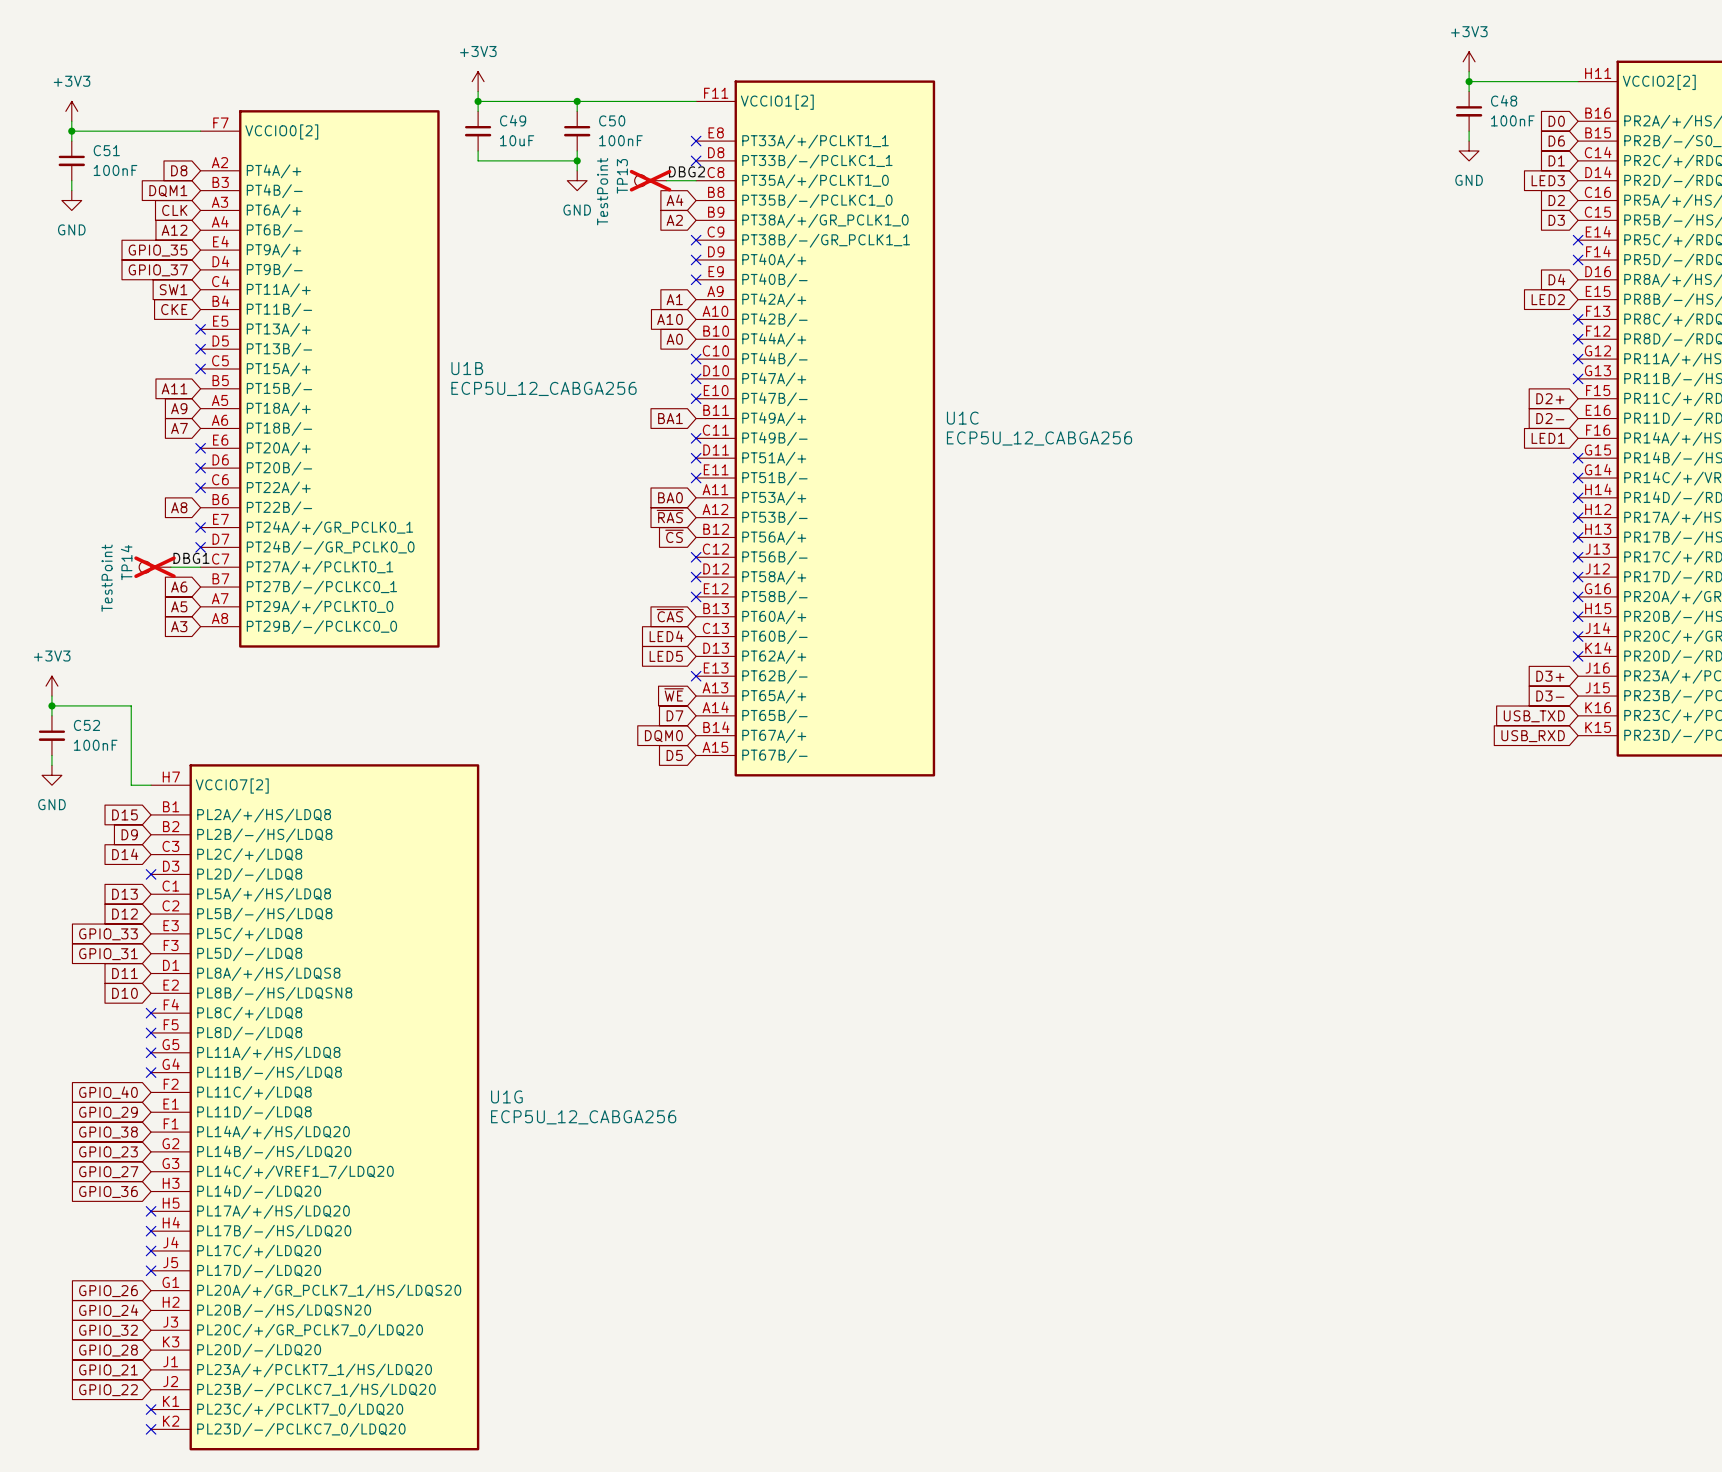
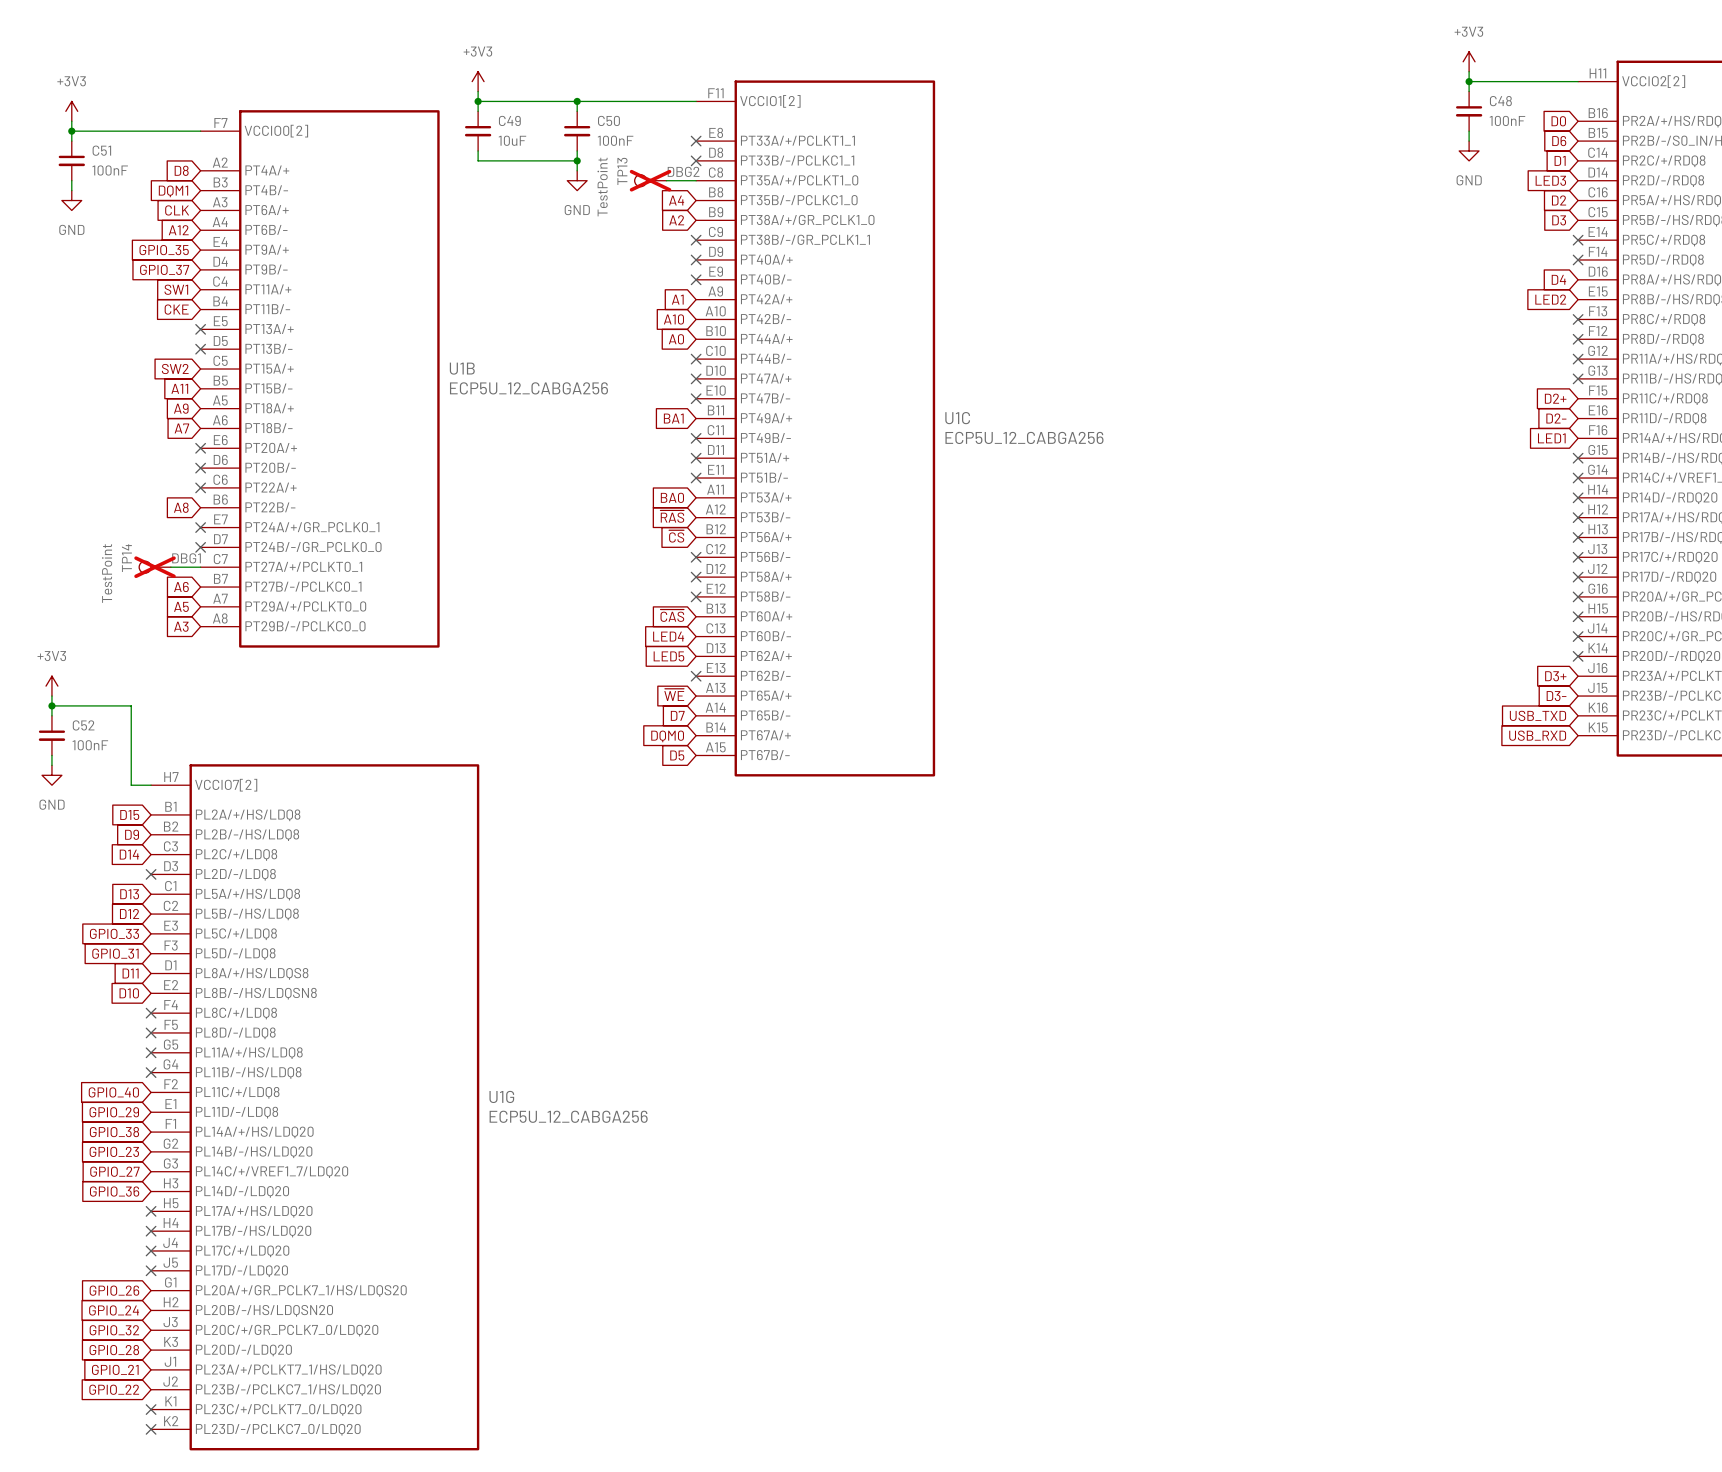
global label: none -> SW2 (175, 369)
no-connect mark: (200, 369) -> none

